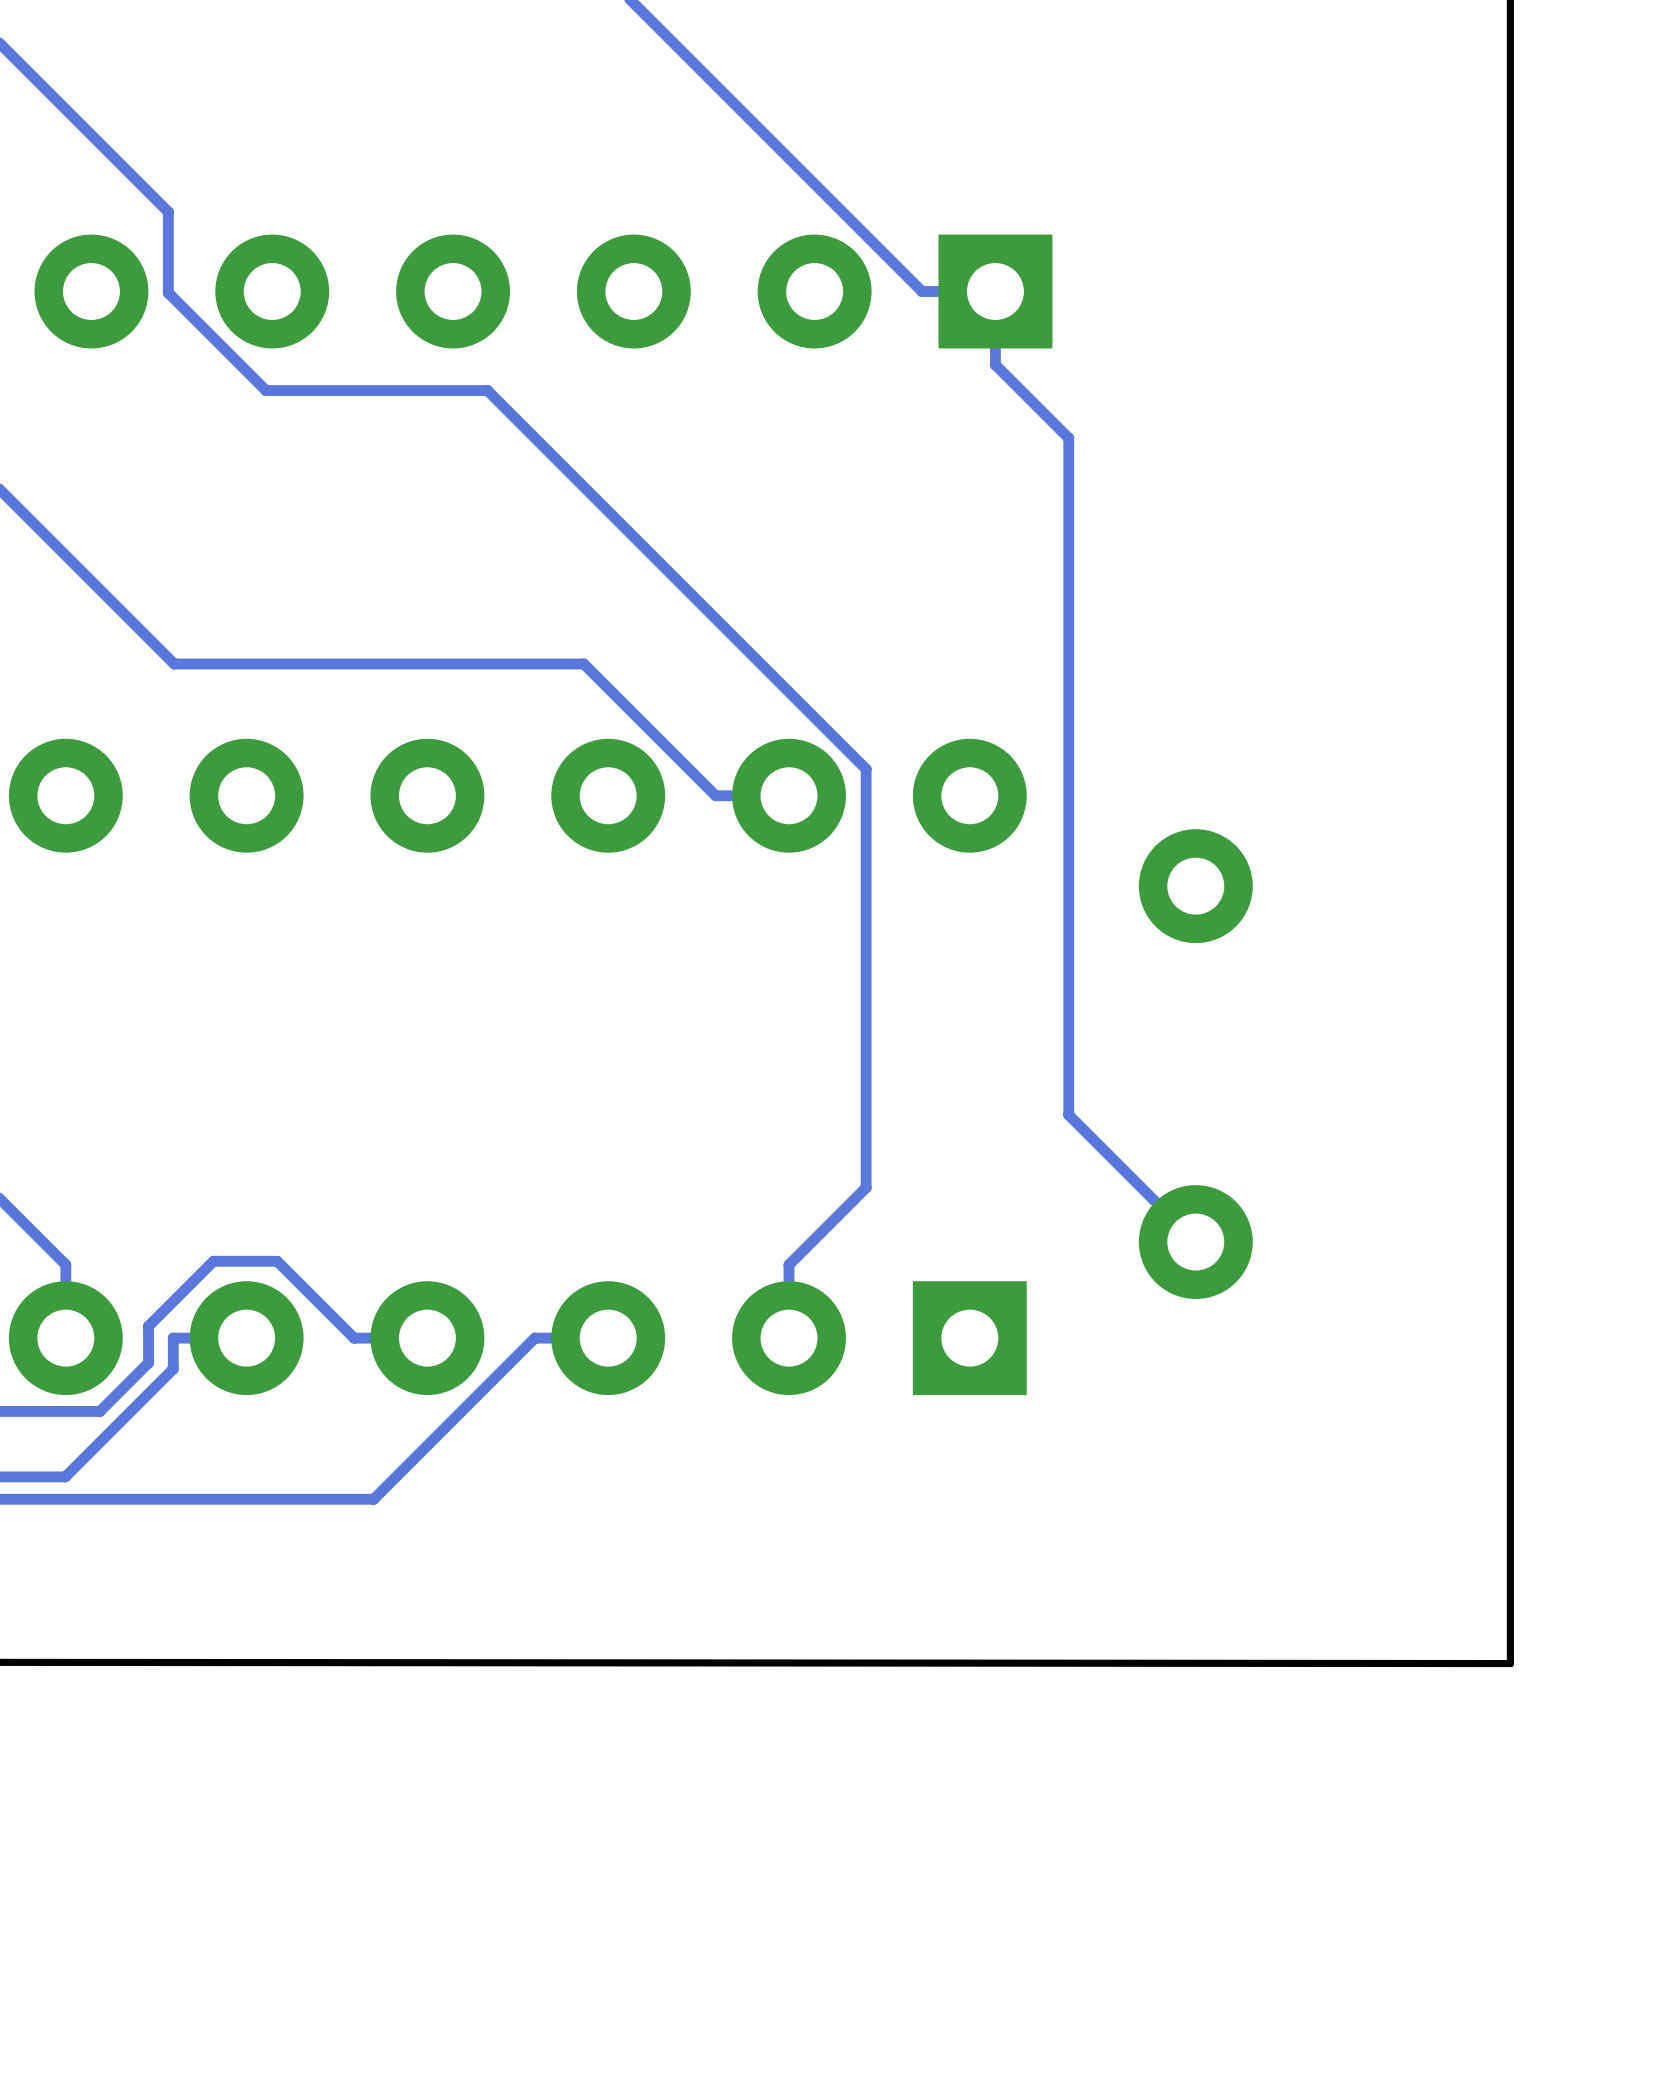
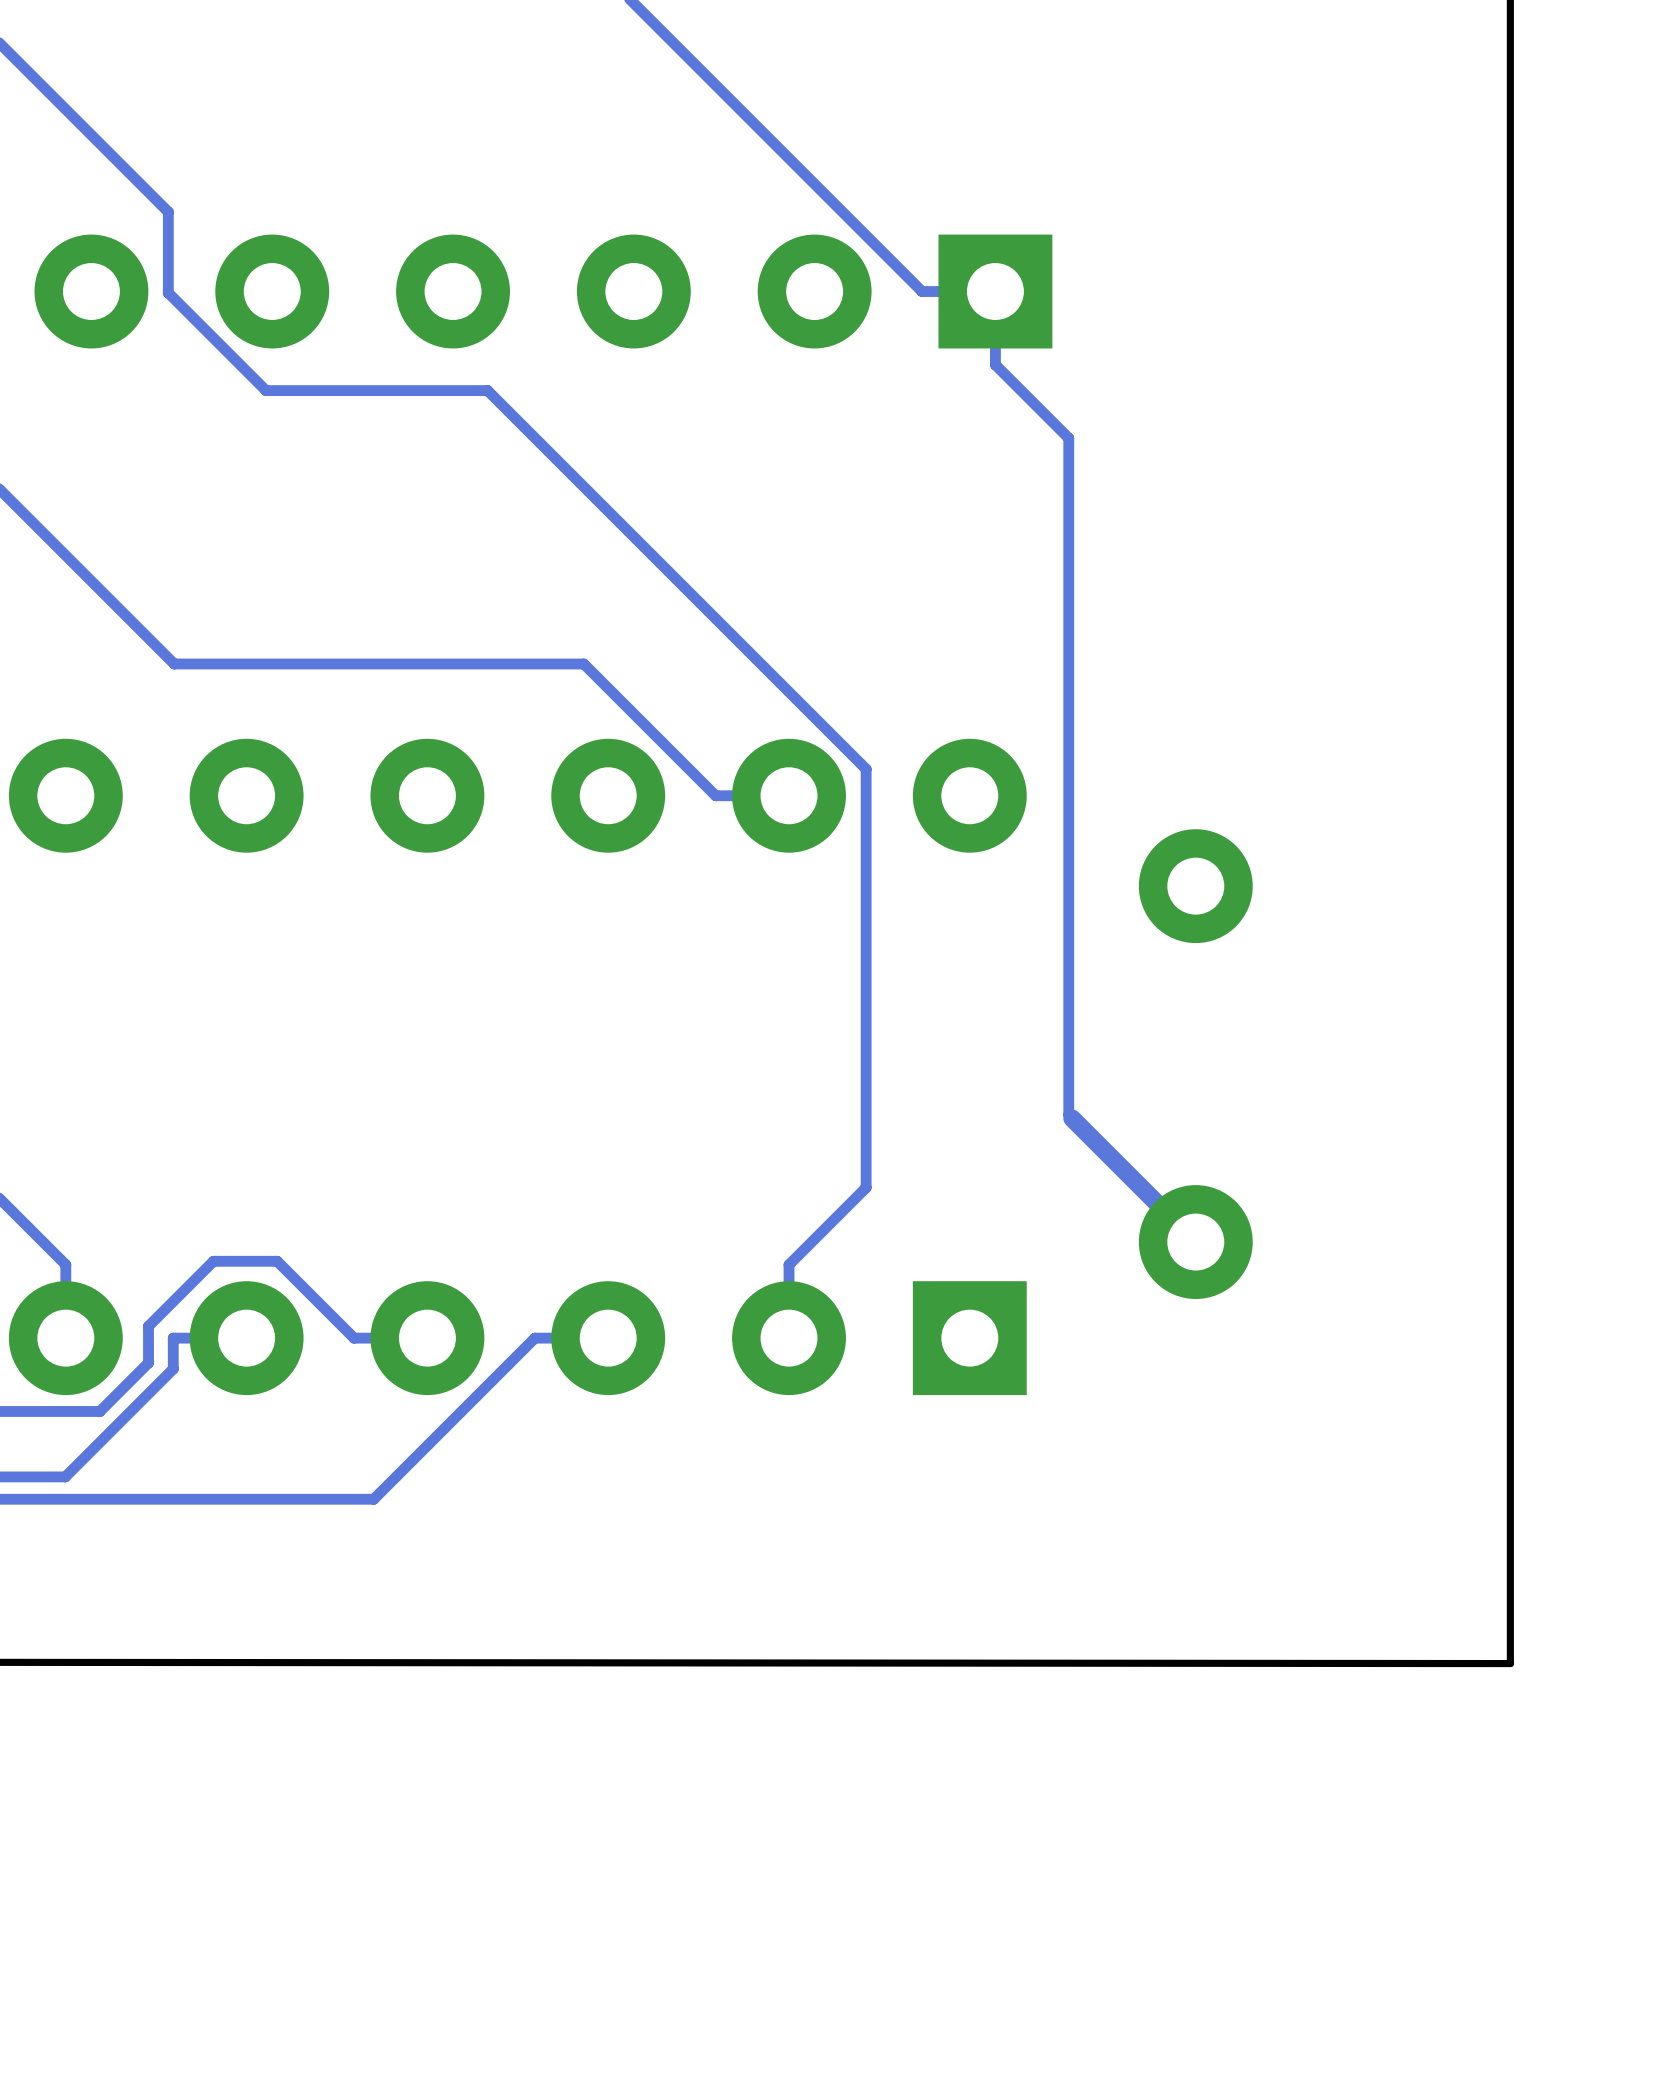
track width: thin (1072, 1118) (1195, 1242) -> thick (1072, 1118) (1195, 1242)

